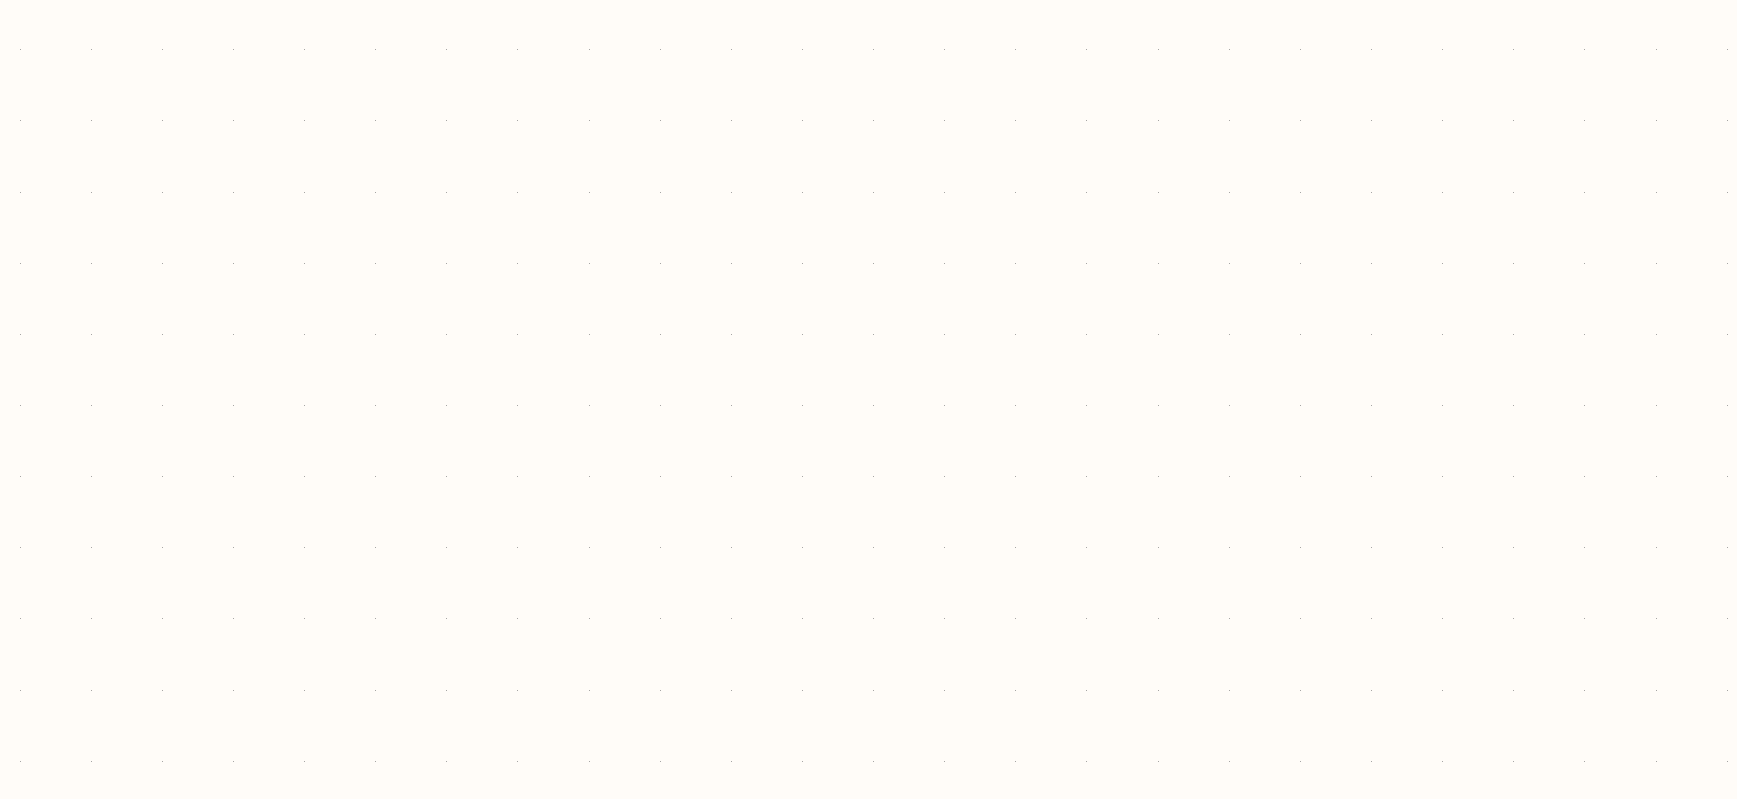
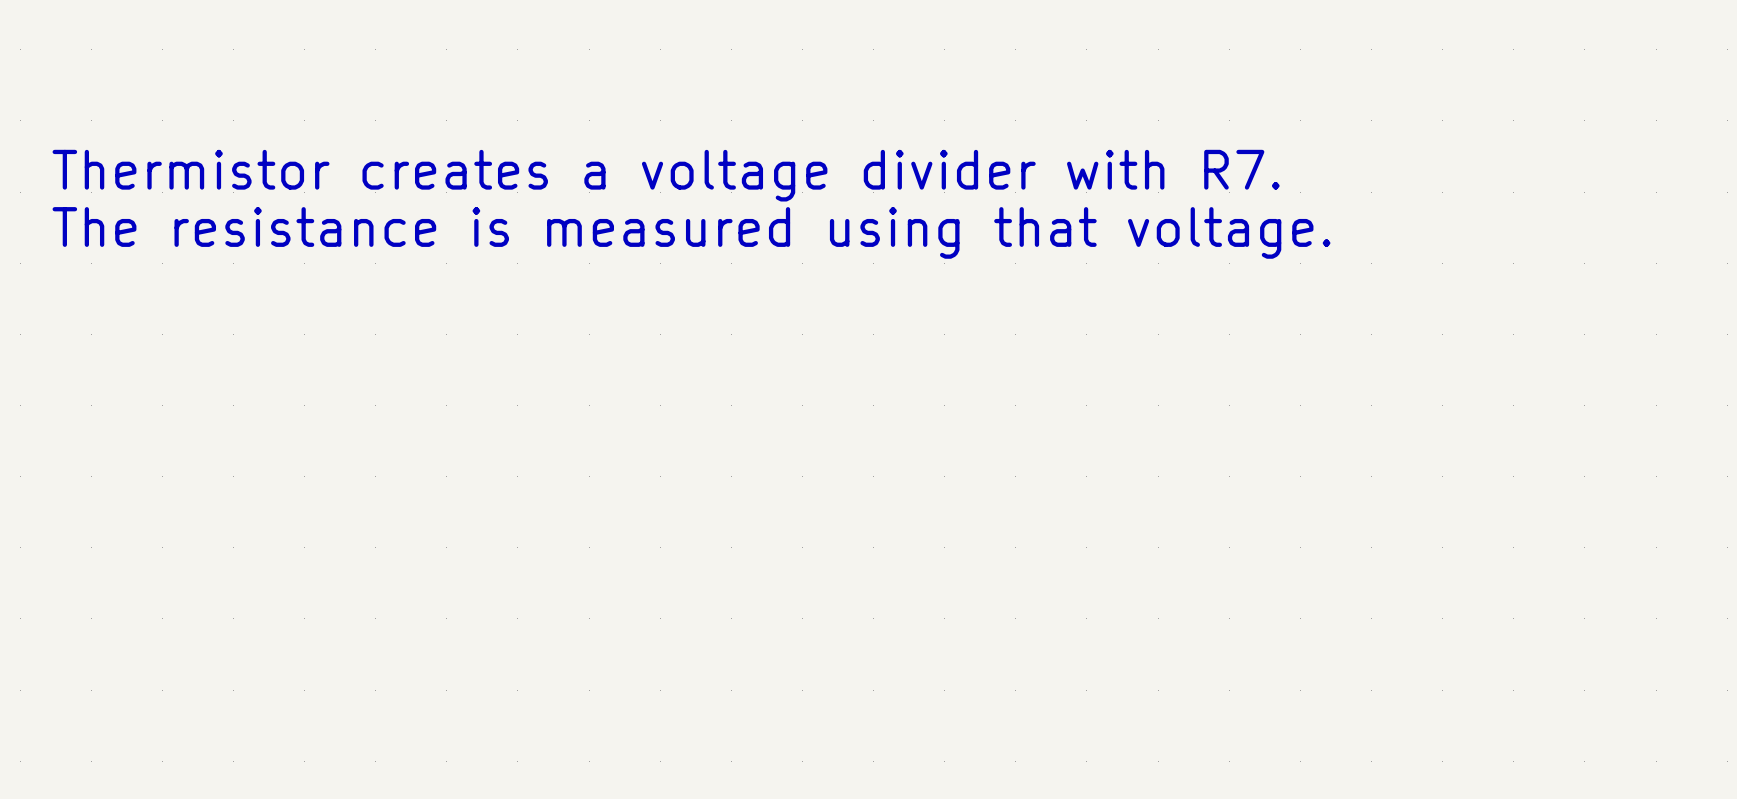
text: none -> Thermistor creates a voltage divider with R7. (666, 175)
text: none -> The resistance is measured using that voltage. (691, 232)

